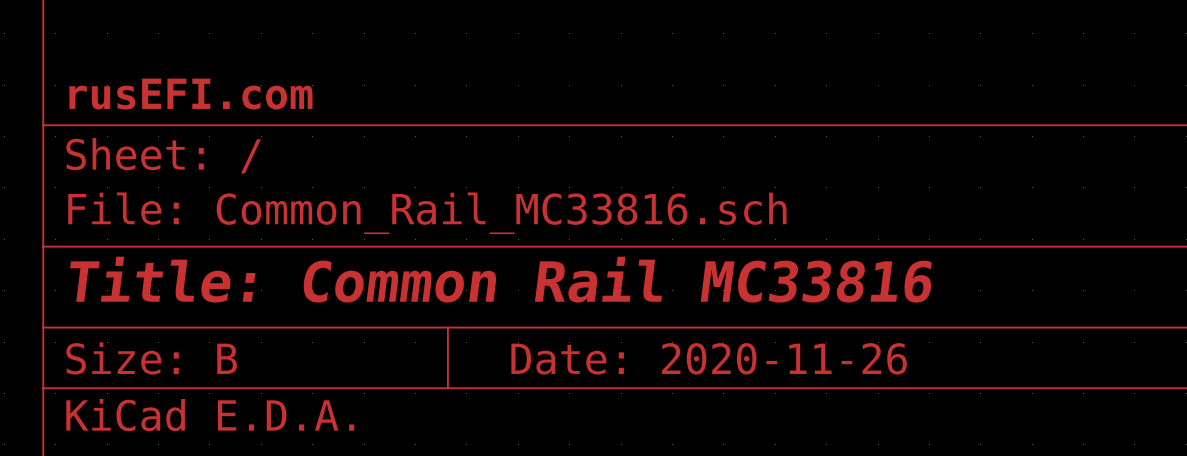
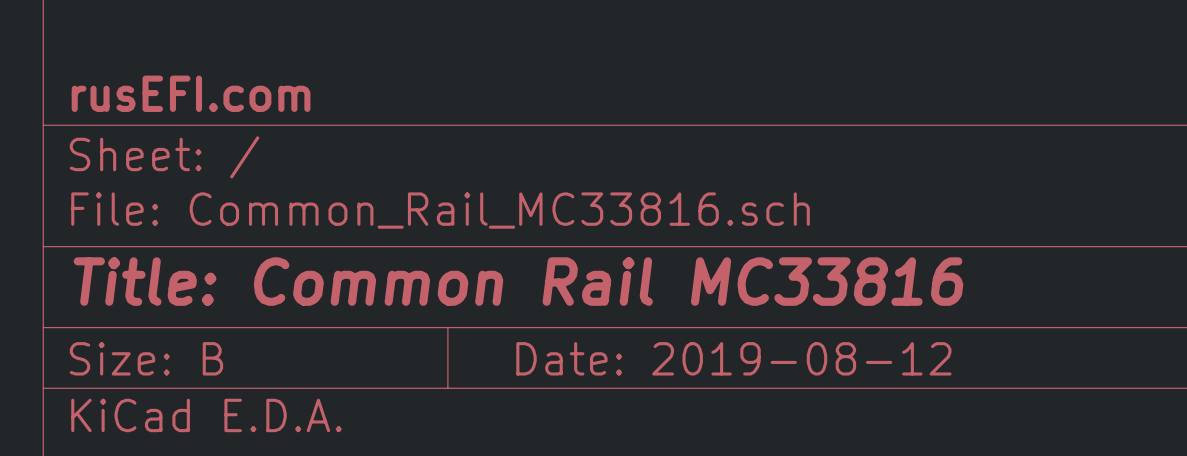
title block: Date: 2020-11-26 (709, 358) -> Date: 2019-08-12 (733, 358)

